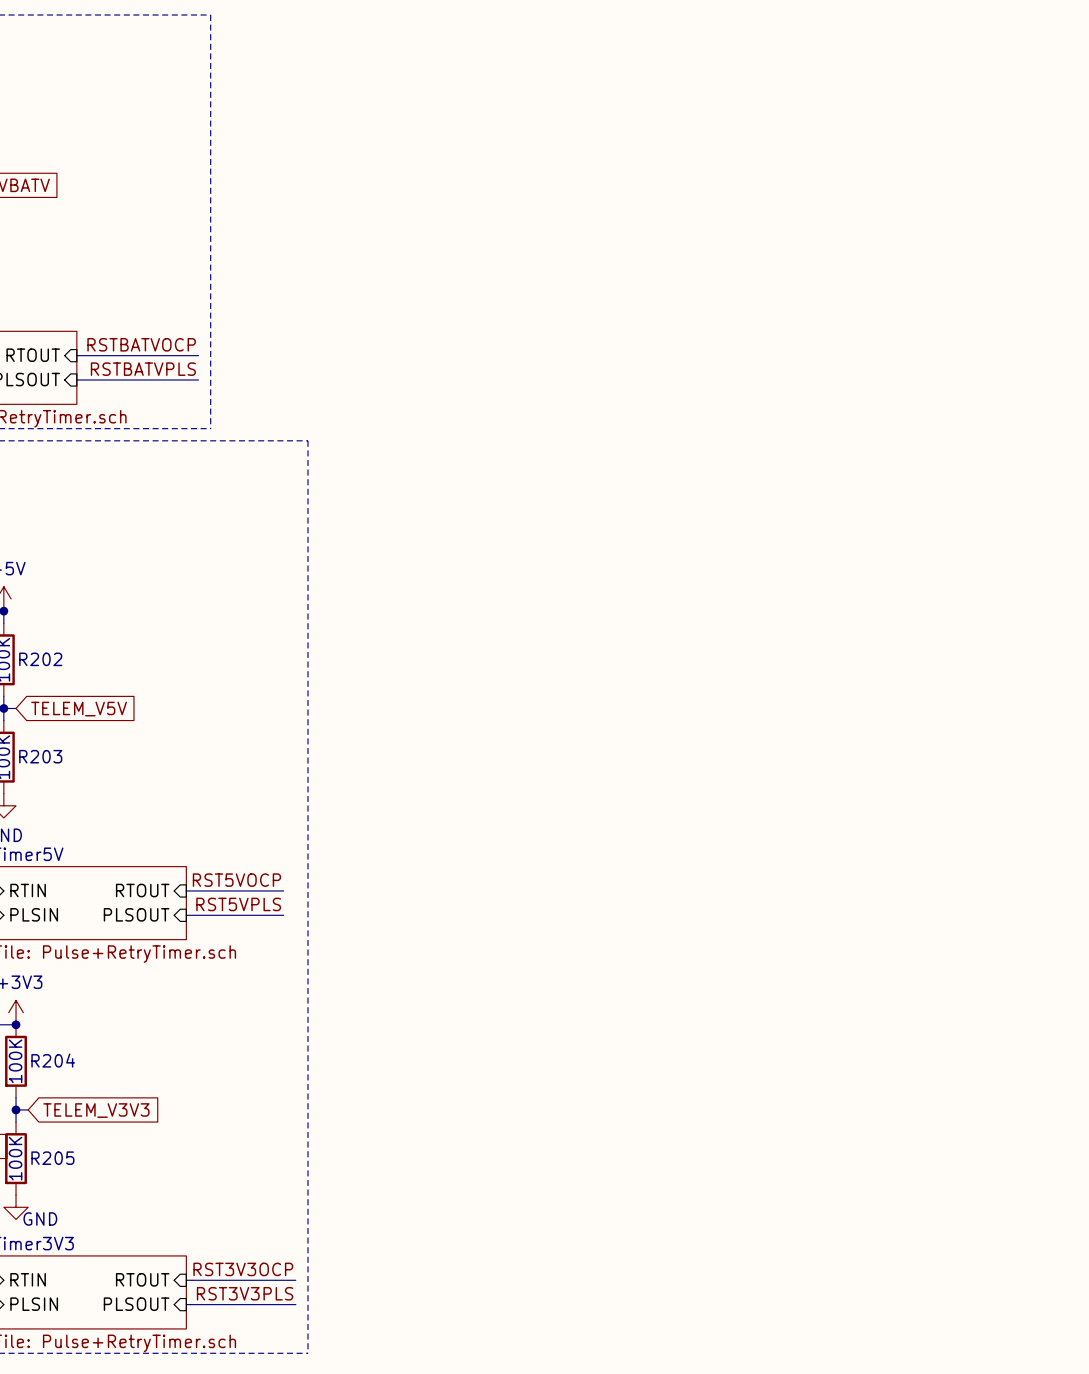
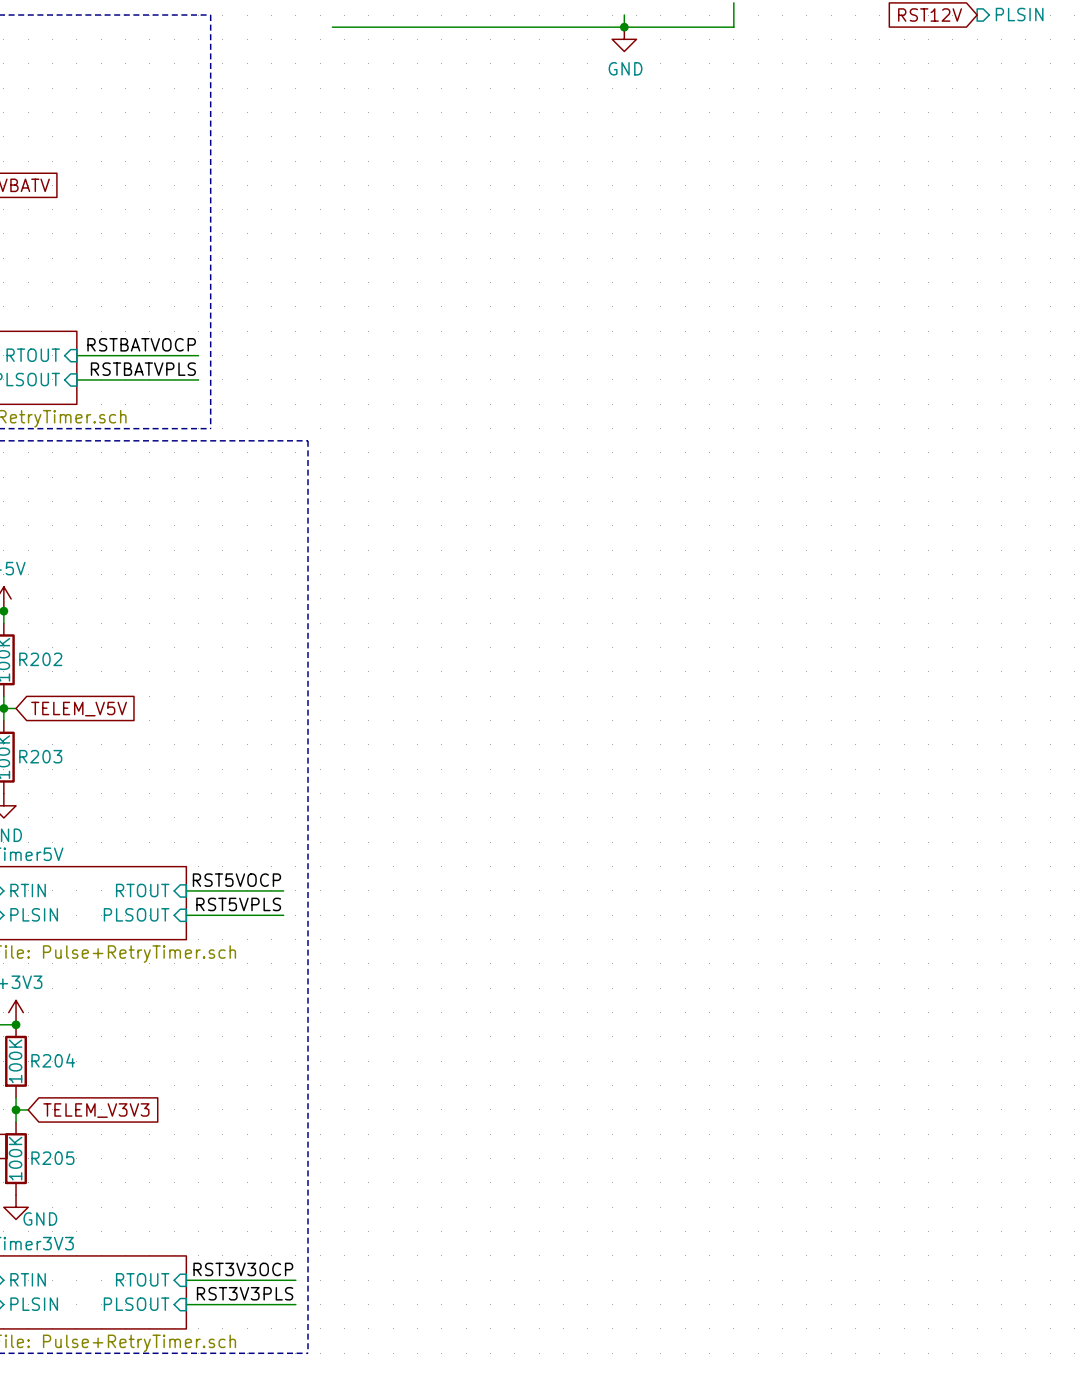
wire: none -> (733, 2) (733, 27) (332, 27)
sheet pin: none -> PLSIN (1019, 14)
wire: none -> (624, 15) (624, 27)
global label: none -> RST12V (930, 15)
junction: none -> (624, 27)
power symbol: none -> GND (624, 39)

